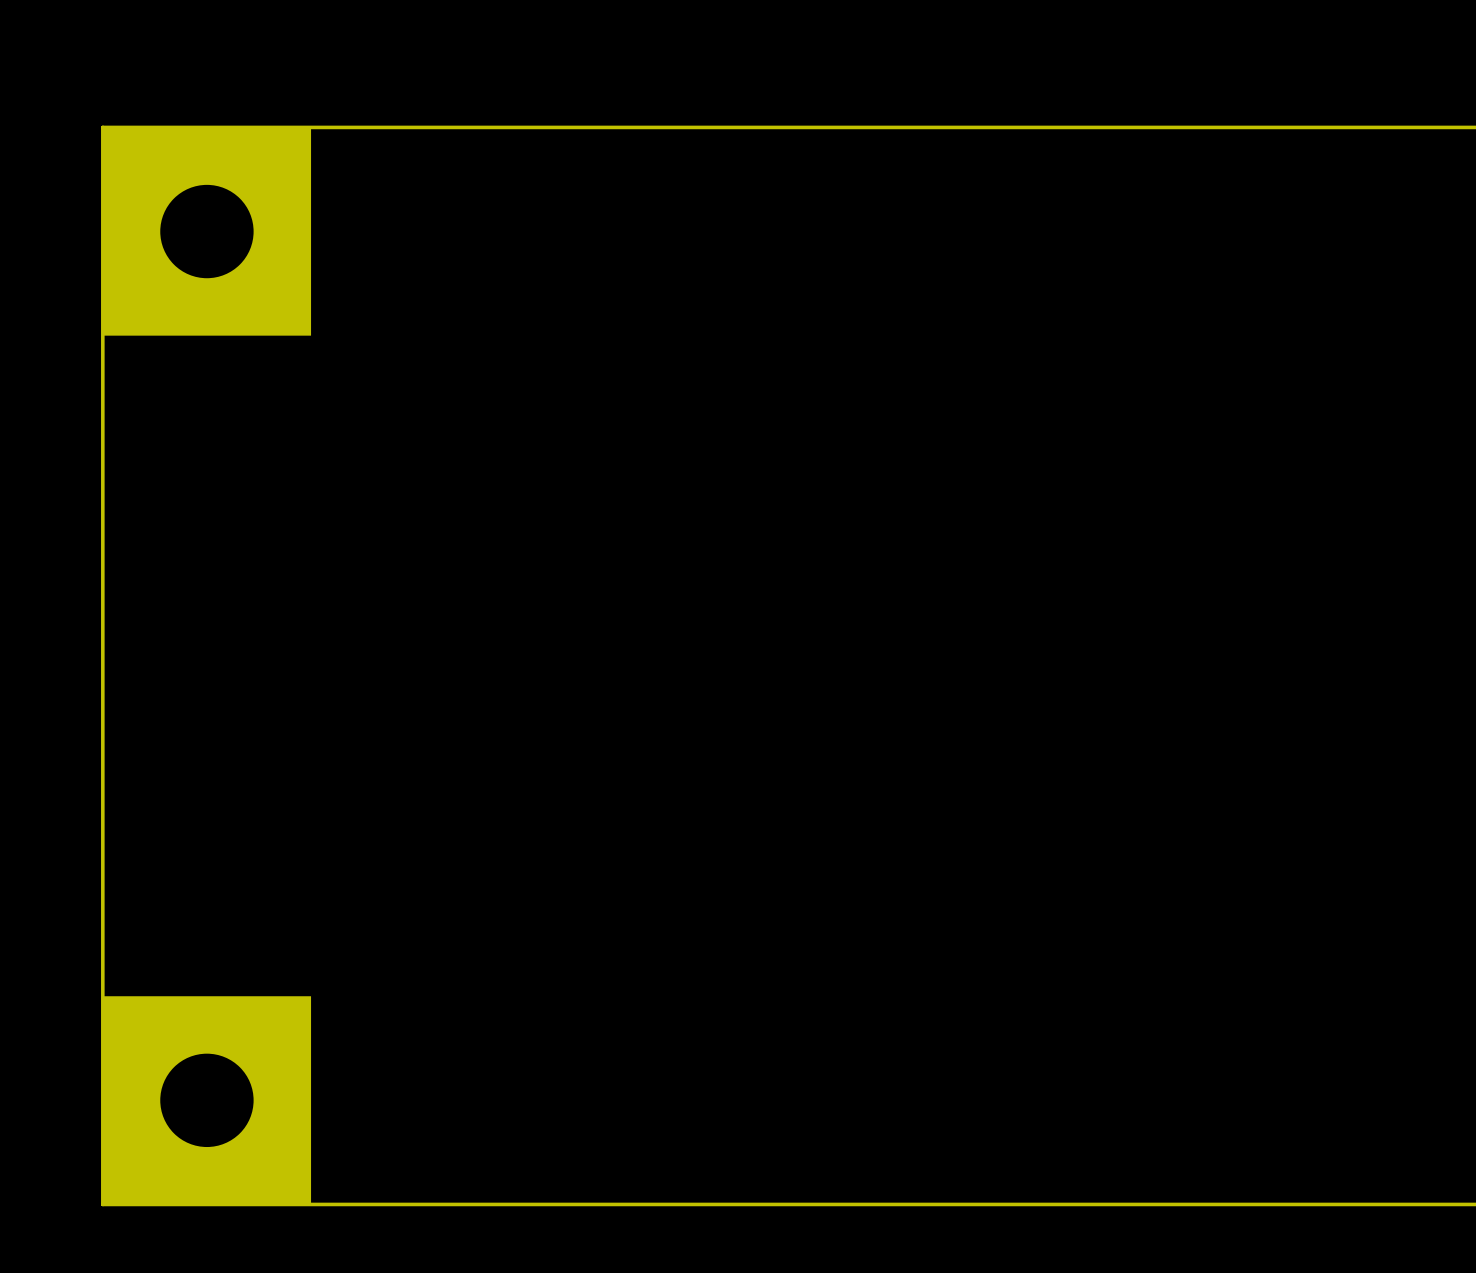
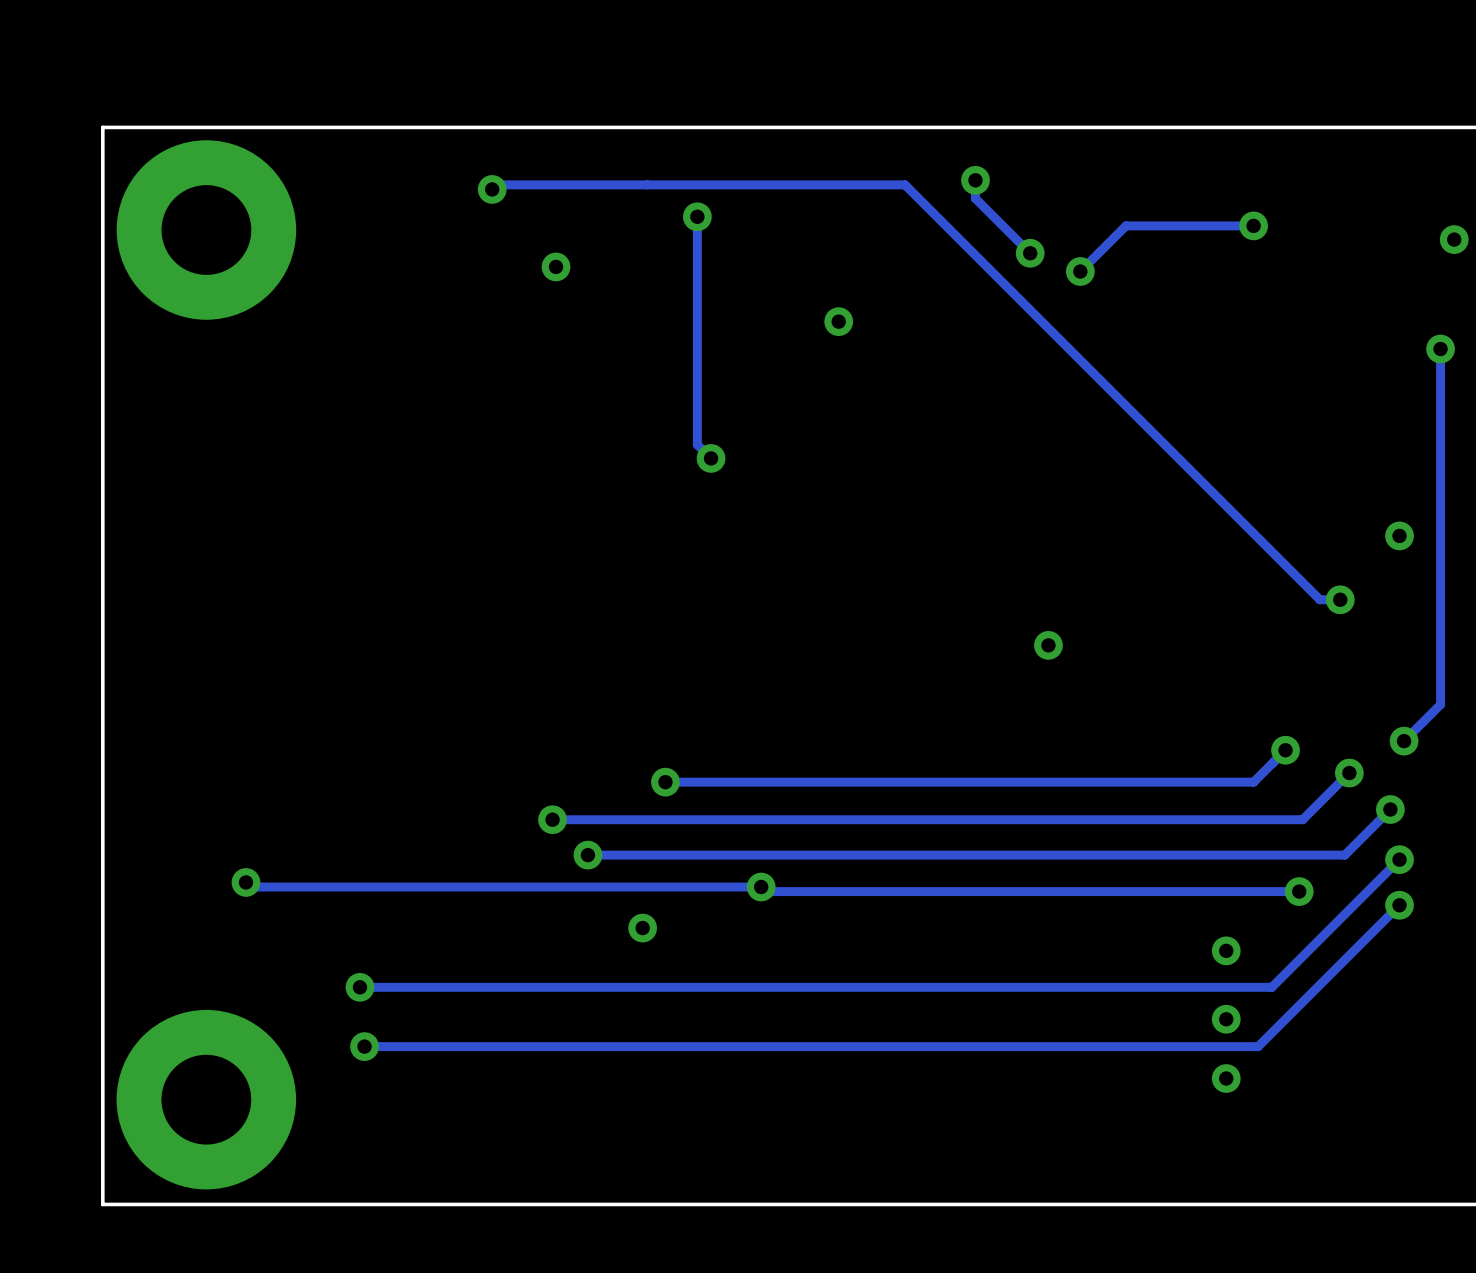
part footprint: [102, 127, 312, 336] -> [116, 140, 297, 320]
track: none -> (975, 180) (975, 198) (1030, 253)
via: none -> (975, 180)
track: none -> (492, 189) (496, 184) (905, 184) (1319, 599) (1340, 599)
via: none -> (492, 189)
track: none -> (697, 216) (697, 444) (711, 458)
via: none -> (697, 216)
track: none -> (1253, 225) (1125, 225) (1080, 271)
via: none -> (1253, 225)
via: none -> (1454, 239)
via: none -> (1030, 253)
via: none -> (556, 266)
via: none -> (1080, 271)
via: none -> (838, 321)
track: none -> (1440, 349) (1440, 704) (1404, 741)
via: none -> (1440, 349)
via: none -> (711, 458)
via: none -> (1399, 535)
via: none -> (1340, 599)
via: none -> (1048, 645)
via: none -> (1404, 741)
track: none -> (1285, 750) (1253, 782) (665, 782) (670, 786)
via: none -> (1285, 750)
track: none -> (1349, 773) (1302, 819) (552, 819)
via: none -> (1349, 773)
via: none -> (665, 782)
track: none -> (1390, 809) (1344, 855) (587, 855)
via: none -> (1390, 809)
via: none -> (552, 819)
via: none -> (587, 855)
track: none -> (1399, 859) (1271, 987) (359, 987)
via: none -> (1399, 859)
track: none -> (245, 882) (250, 887) (761, 887) (765, 891) (1299, 891)
via: none -> (245, 882)
via: none -> (761, 887)
via: none -> (1299, 891)
track: none -> (1399, 905) (1258, 1046) (364, 1046)
via: none -> (1399, 905)
via: none -> (642, 928)
via: none -> (1226, 950)
via: none -> (359, 987)
part footprint: [102, 996, 312, 1205] -> [116, 1009, 297, 1190]
via: none -> (1226, 1019)
via: none -> (364, 1046)
via: none -> (1226, 1078)

